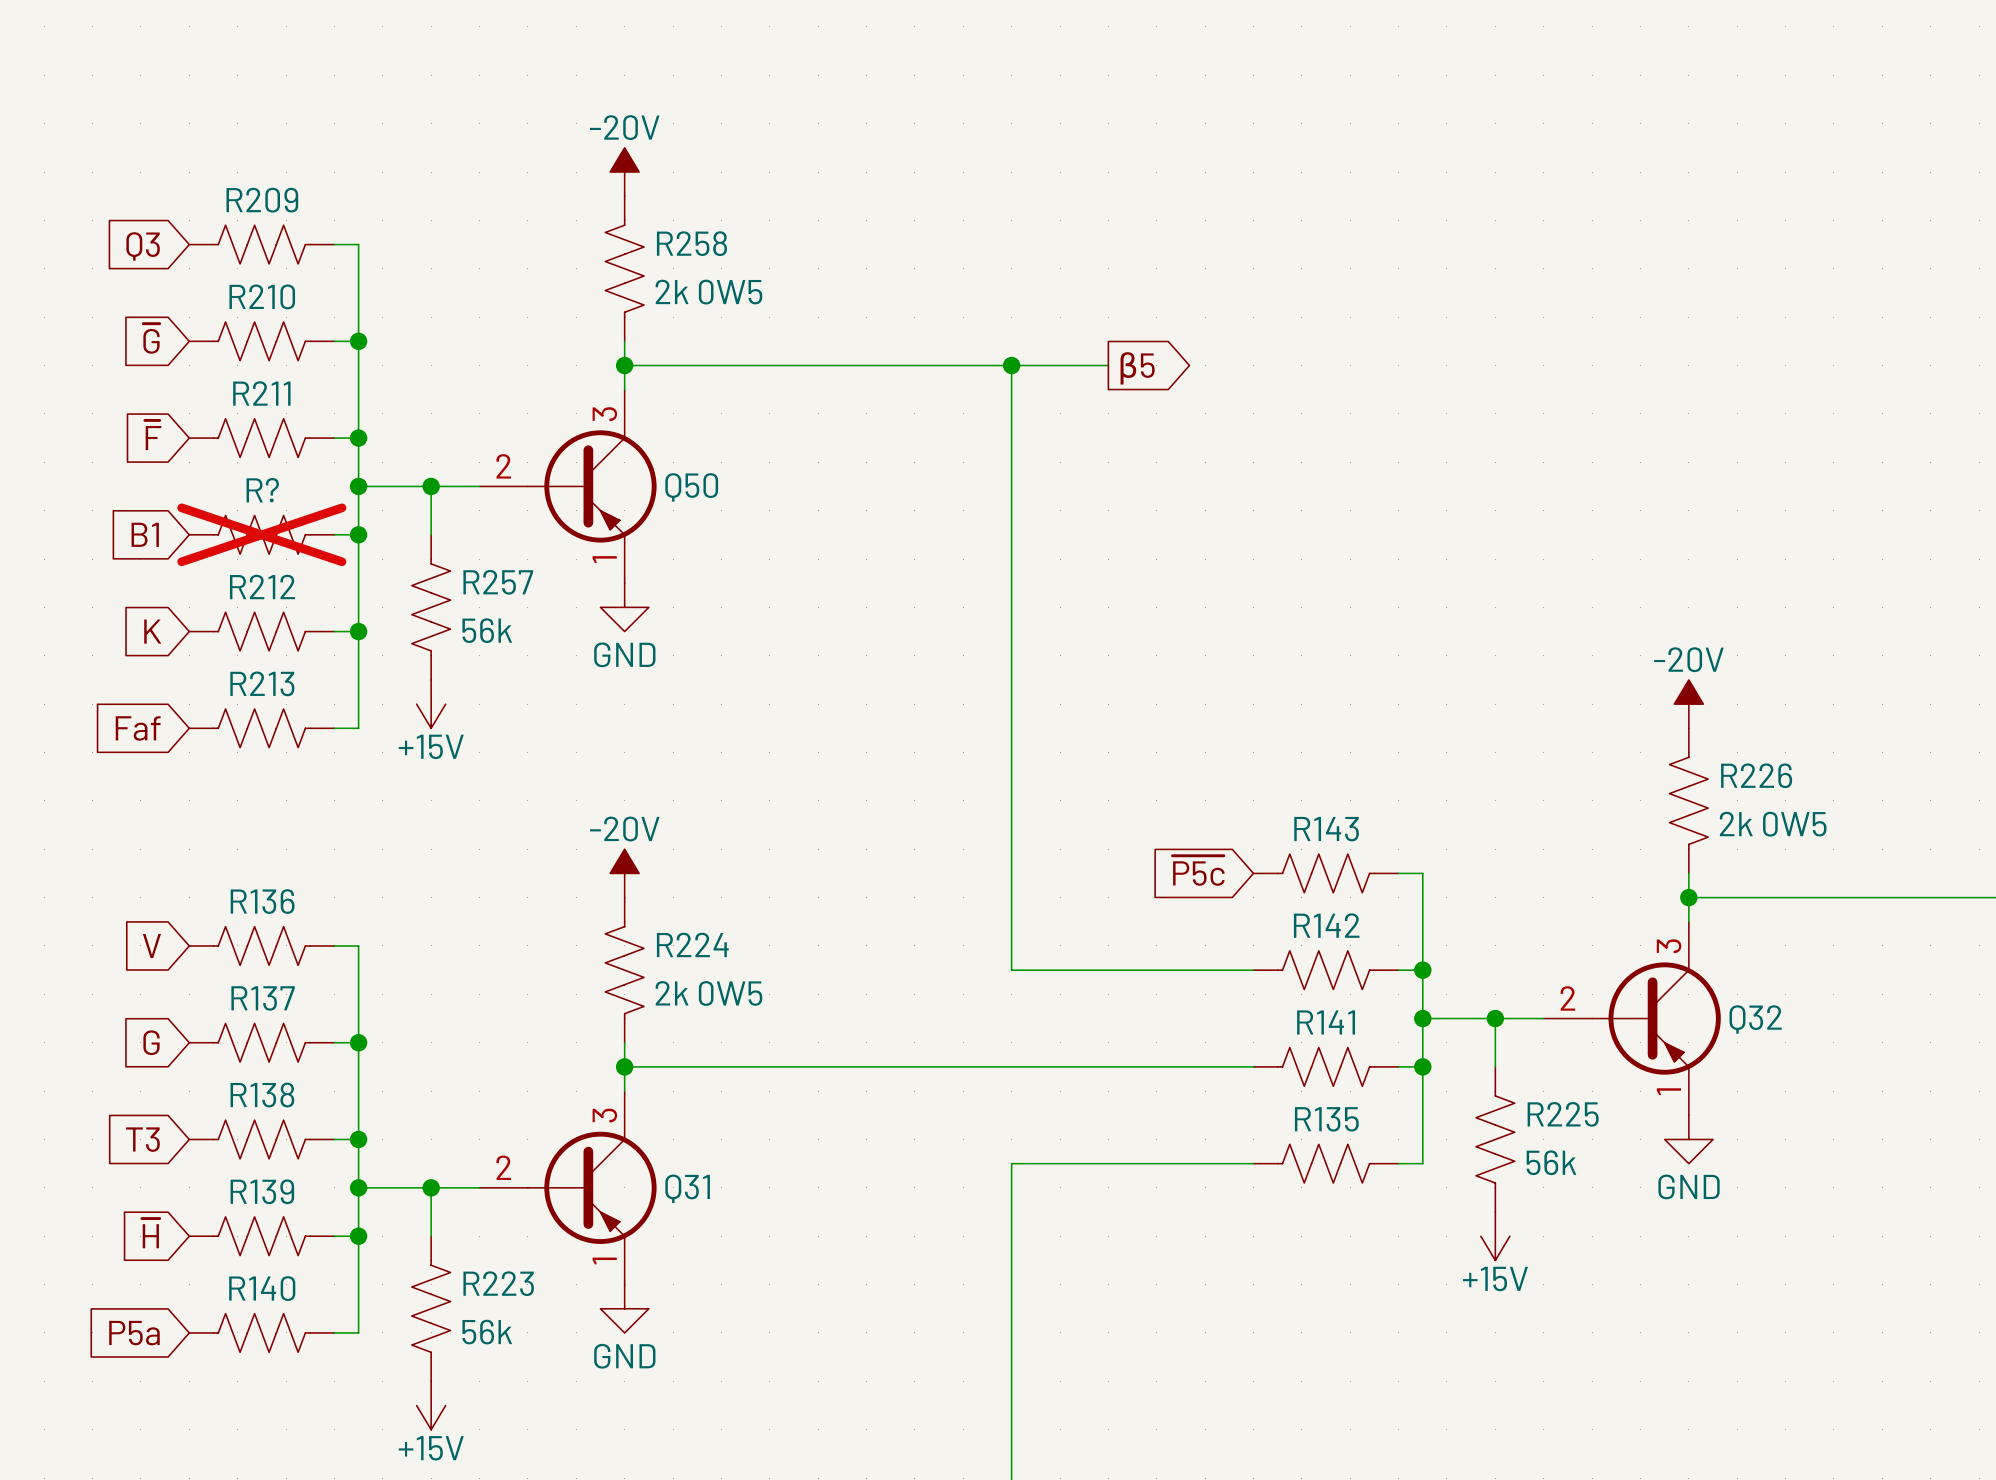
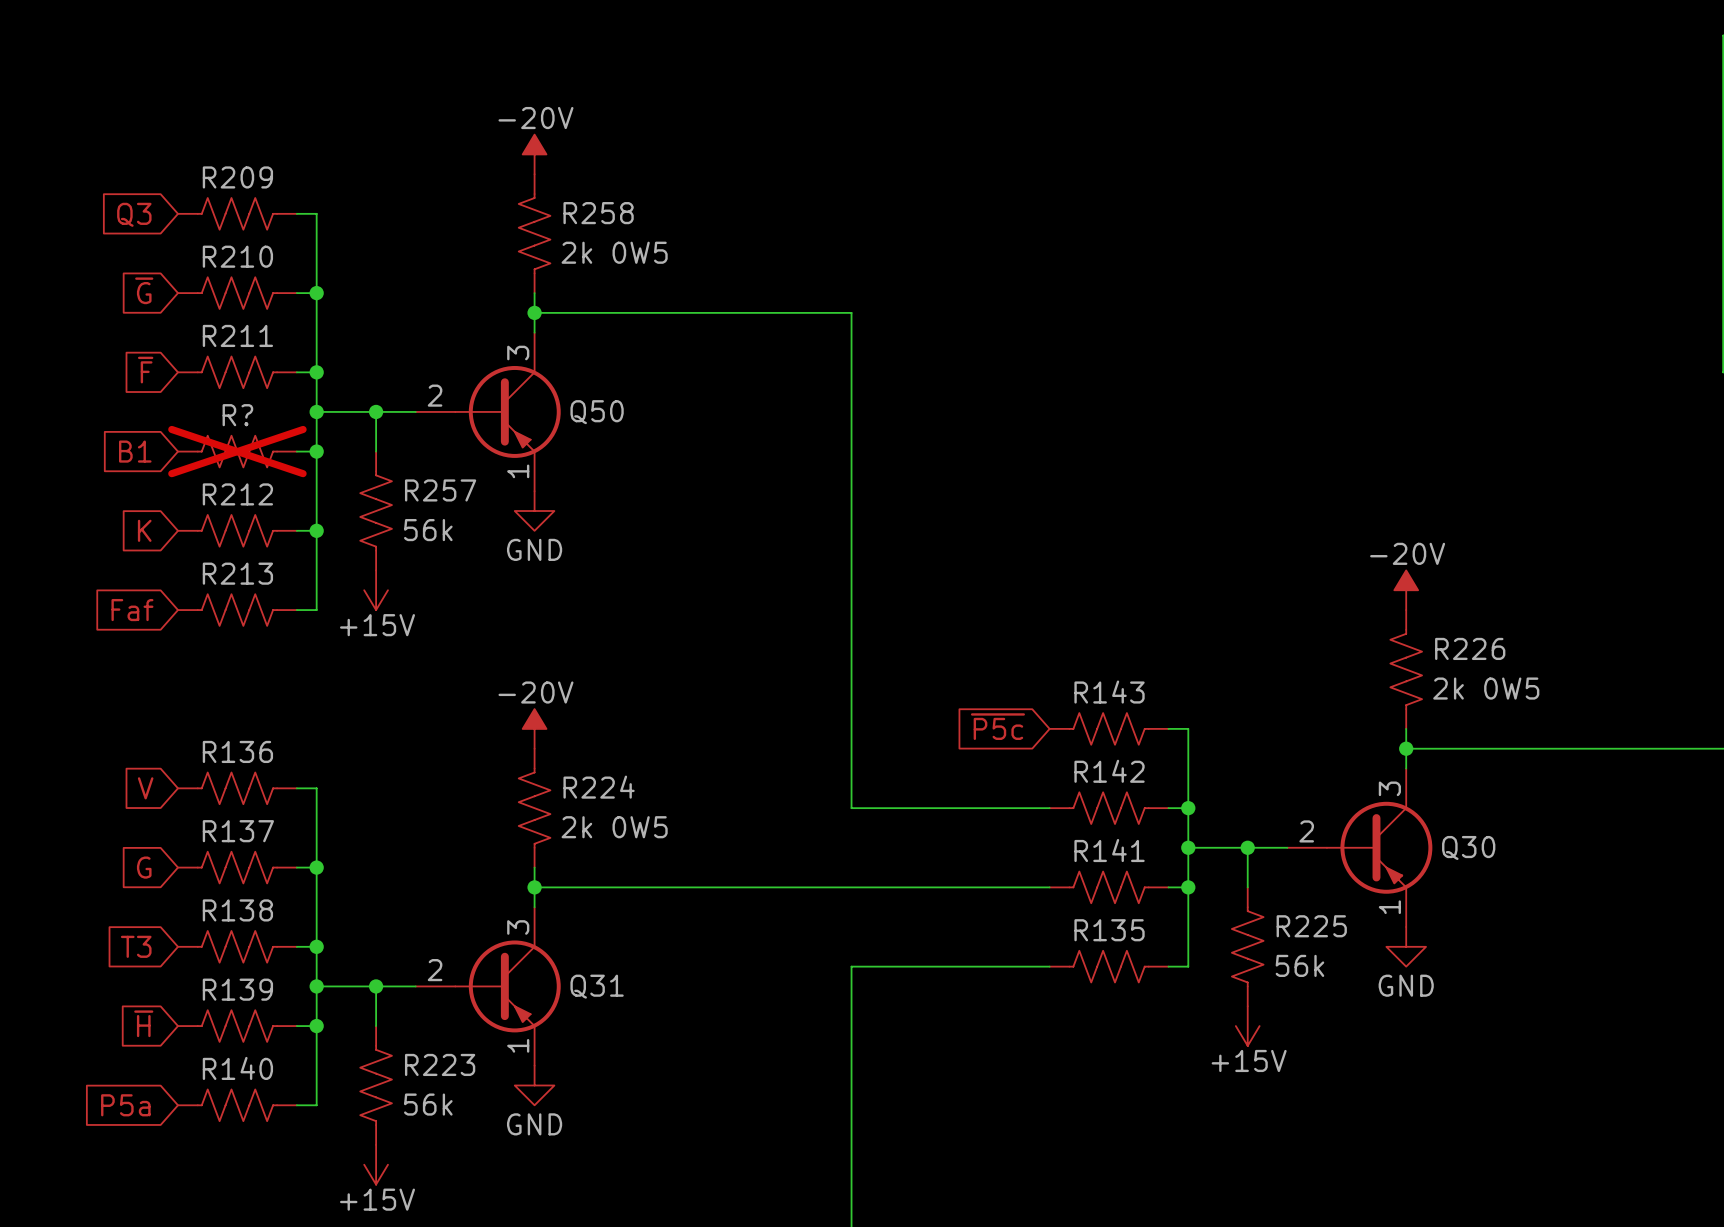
wire: (1011, 365) (1108, 365) -> none
junction: (1011, 365) -> none
global label: β5 (1137, 368) -> none
Q32 name: Q32 (1755, 1019) -> Q30 (1468, 847)

